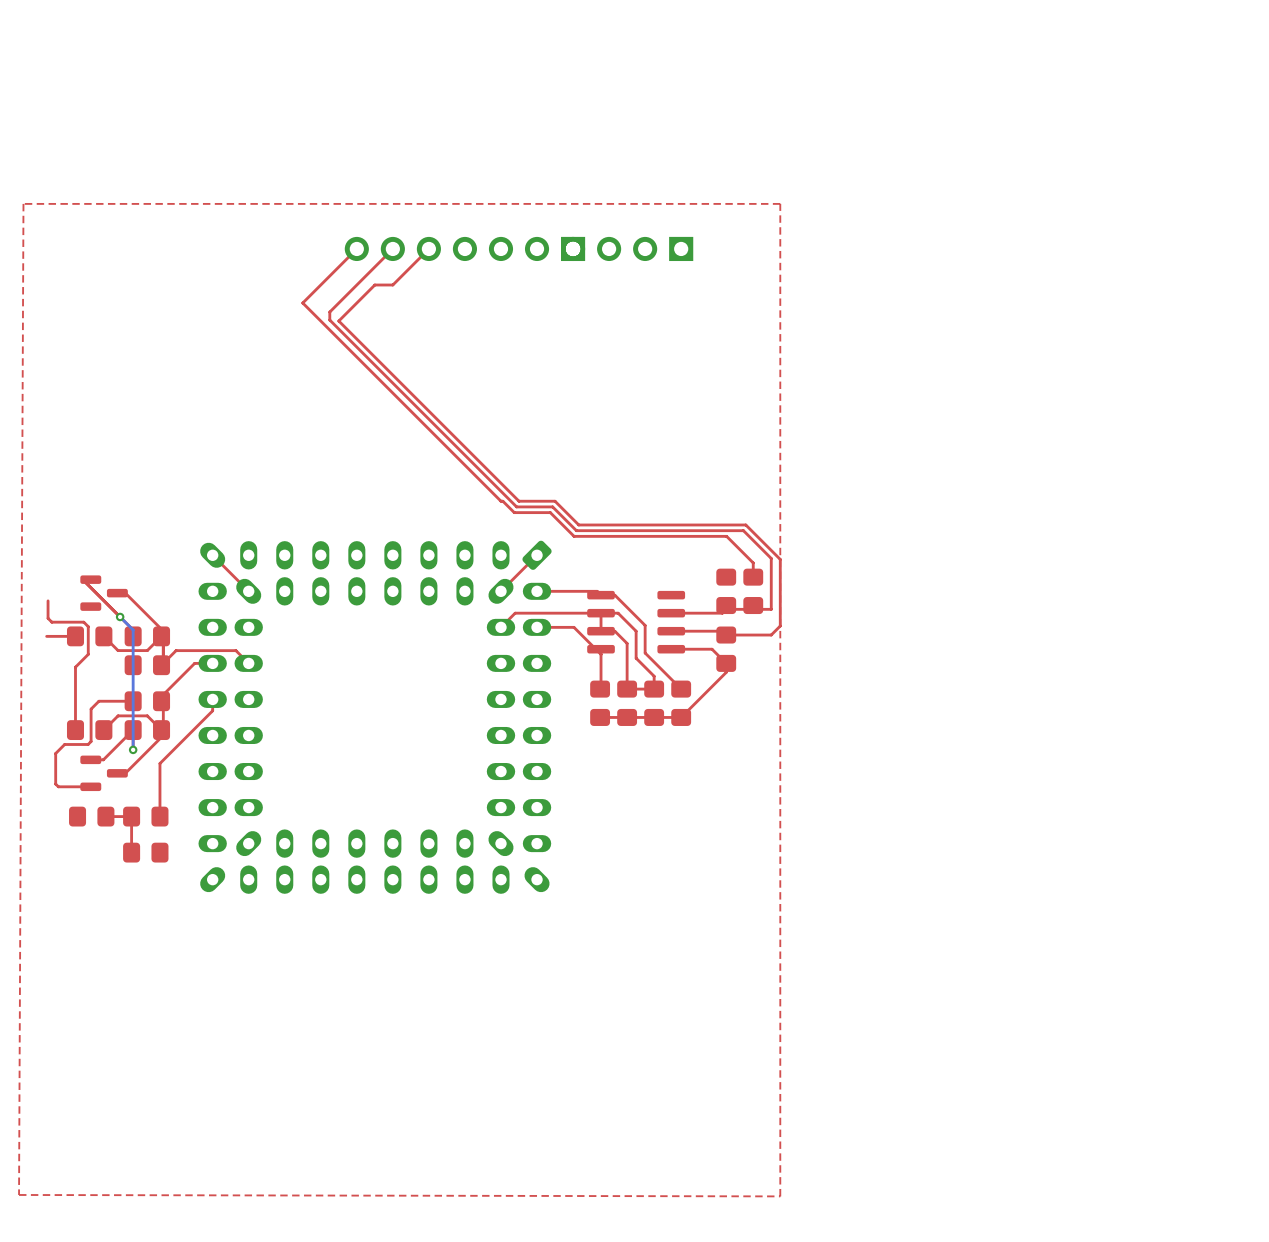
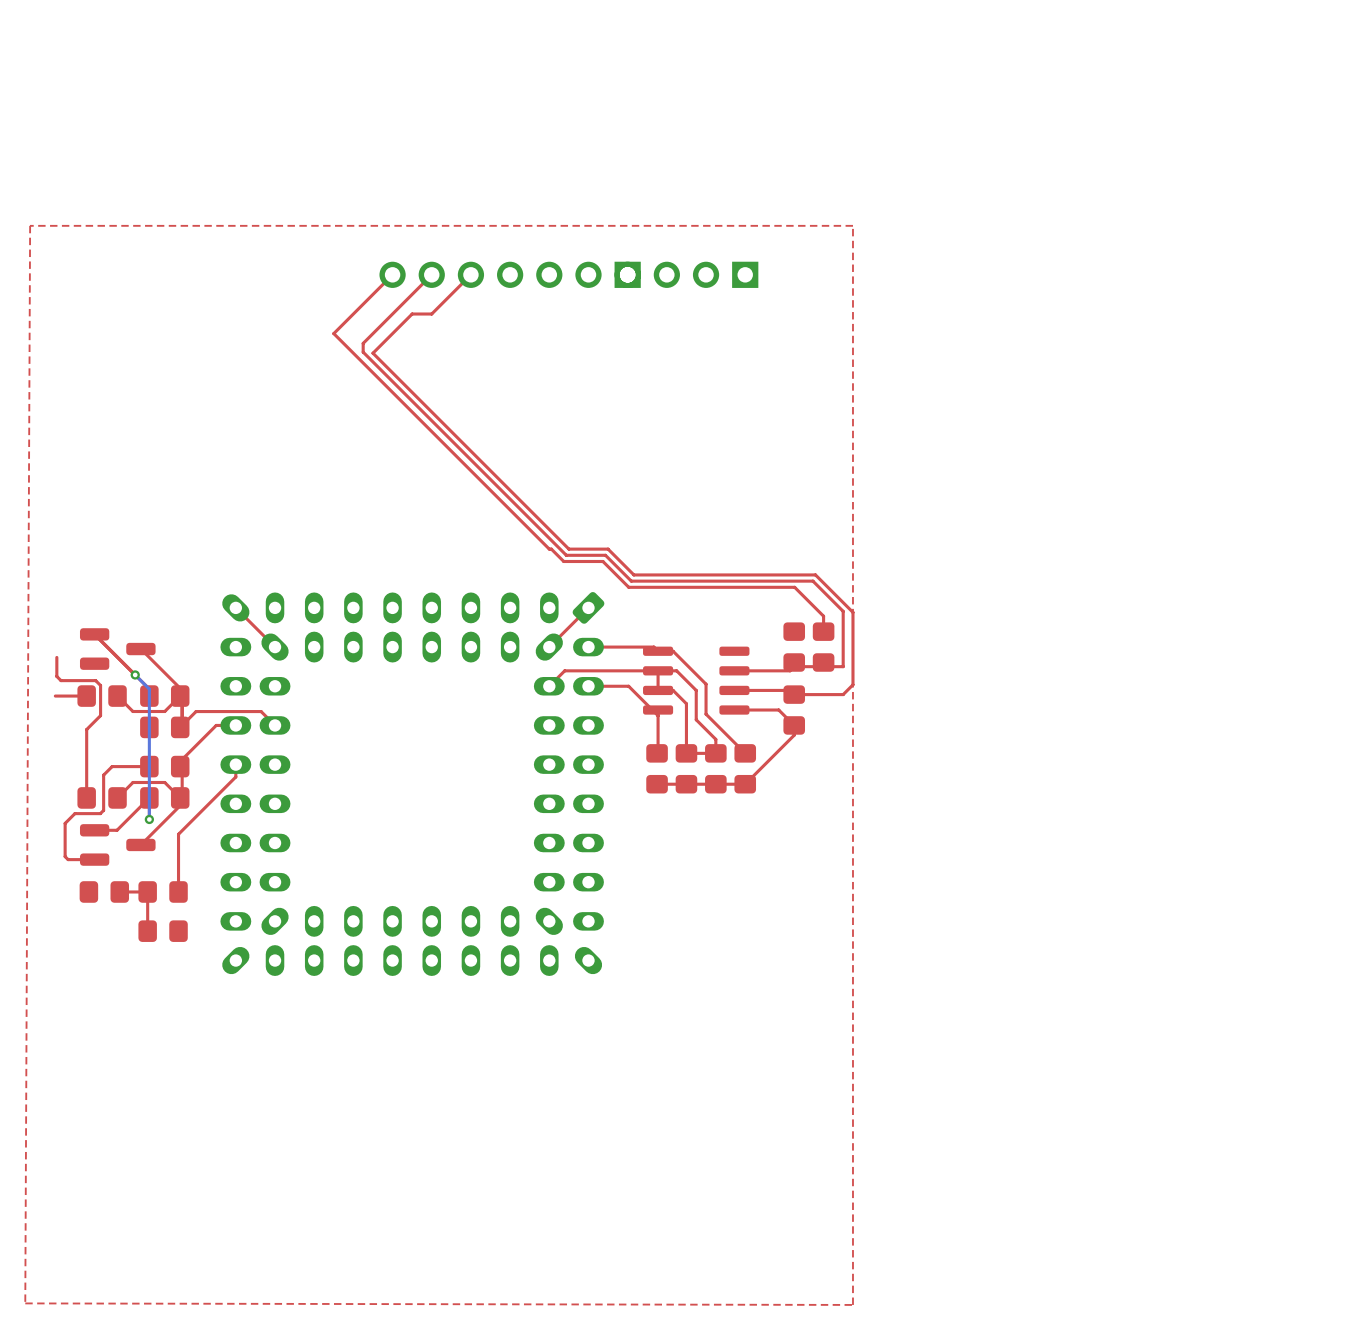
part footprint: [80, 575, 128, 611] -> [79, 628, 156, 670]
part footprint: [80, 755, 128, 792] -> [79, 824, 156, 866]

